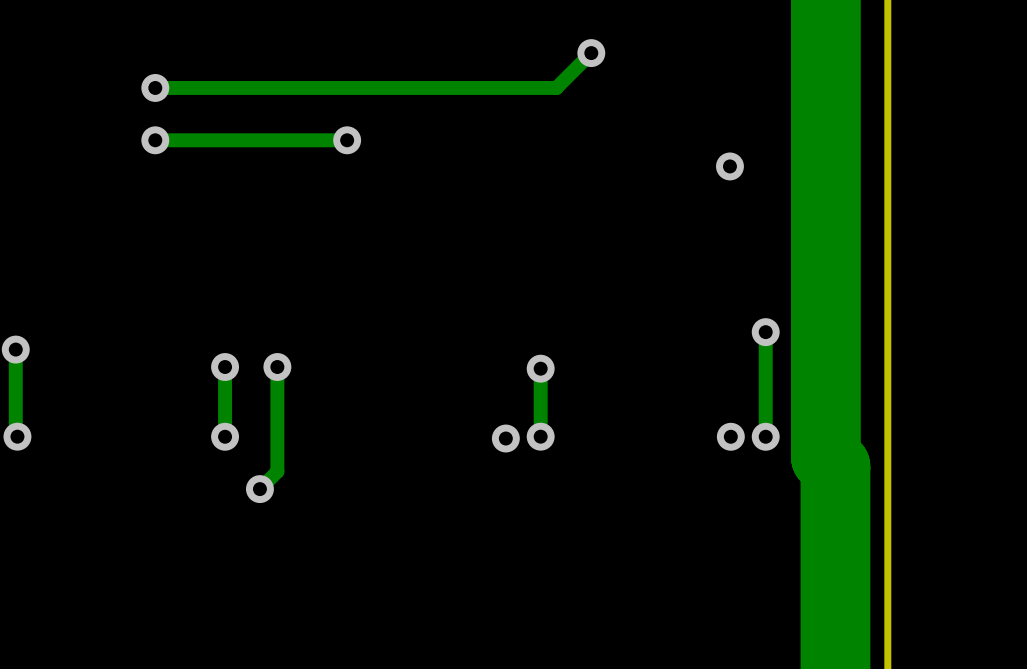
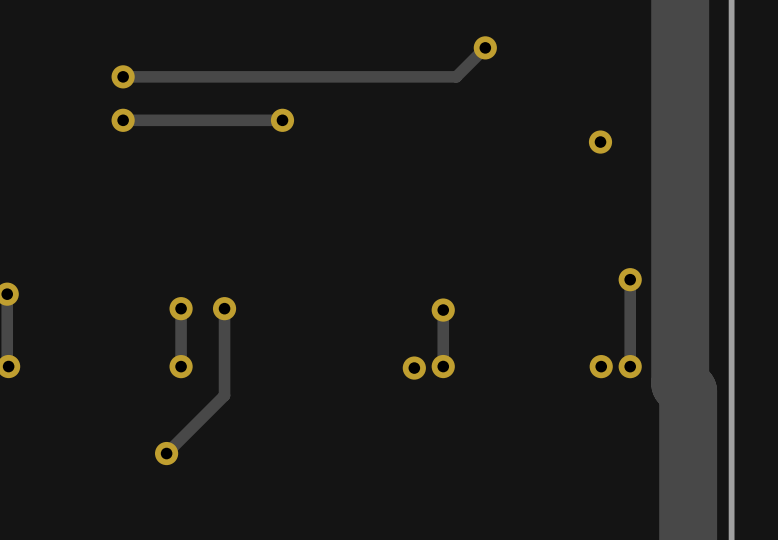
track: none -> (210, 410) (166, 453)
via position: (259, 489) -> (166, 453)

